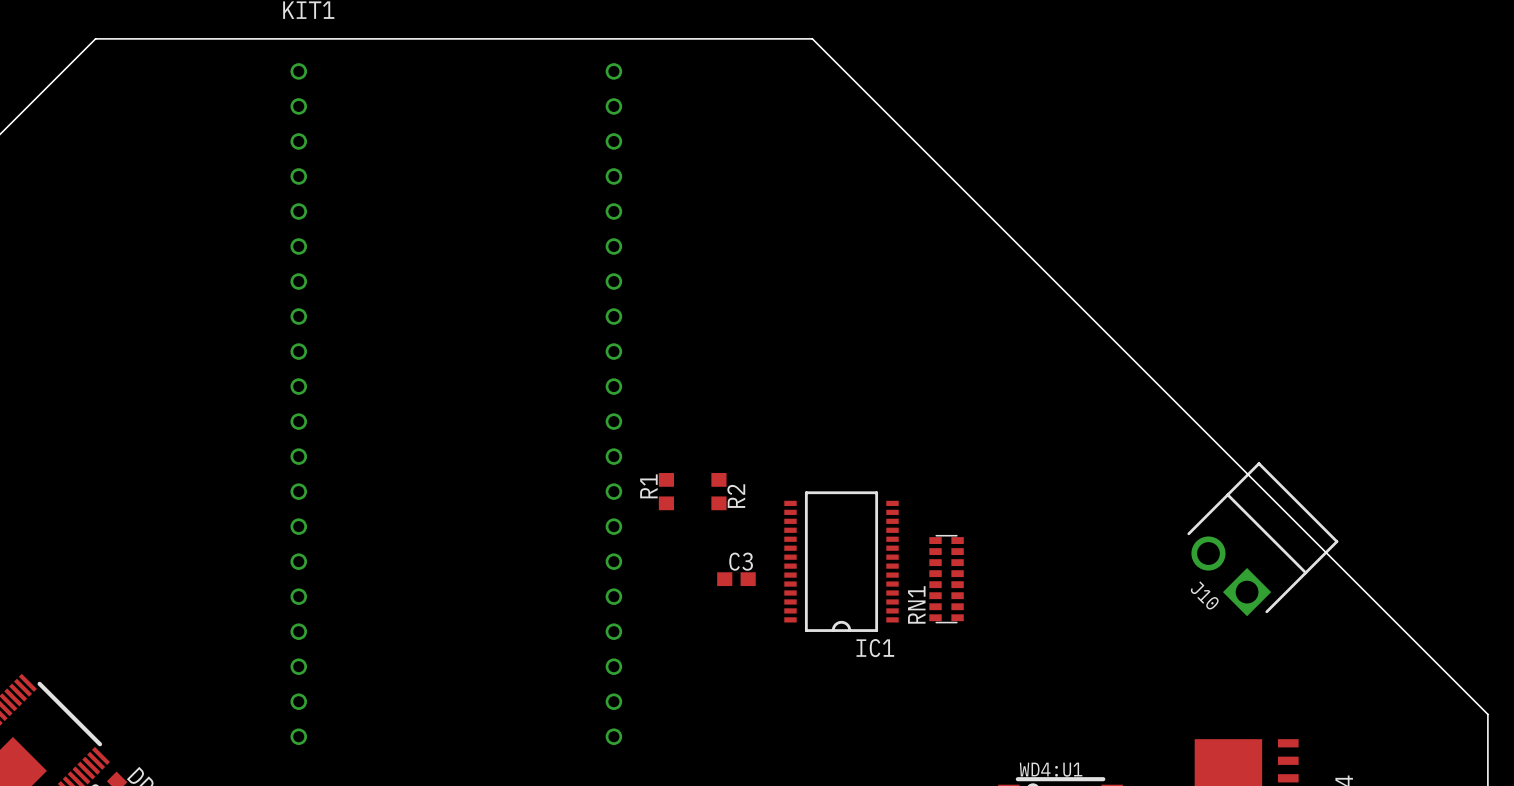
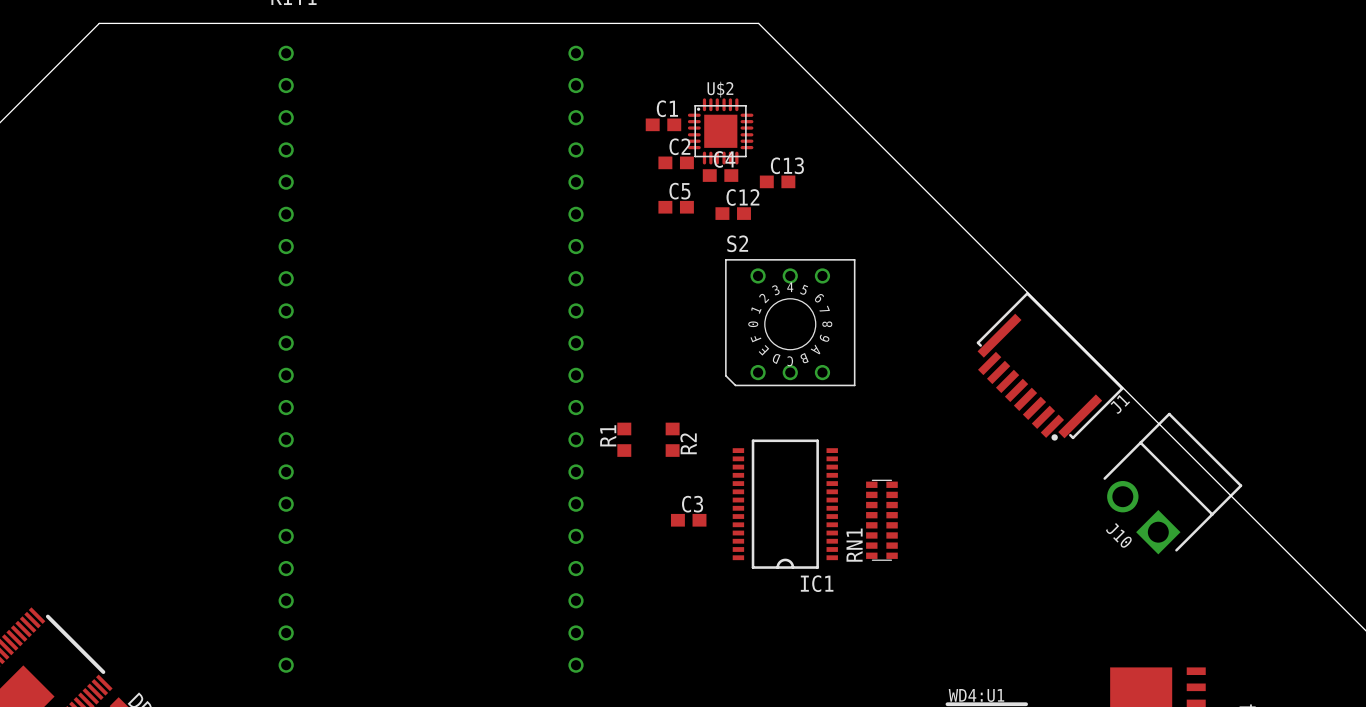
C1: none -> (663, 124)
U$2: none -> (720, 131)
C2: none -> (676, 162)
C4: none -> (720, 175)
C13: none -> (777, 181)
C5: none -> (676, 207)
C12: none -> (733, 213)
S2: none -> (790, 322)
J1: none -> (1050, 366)

